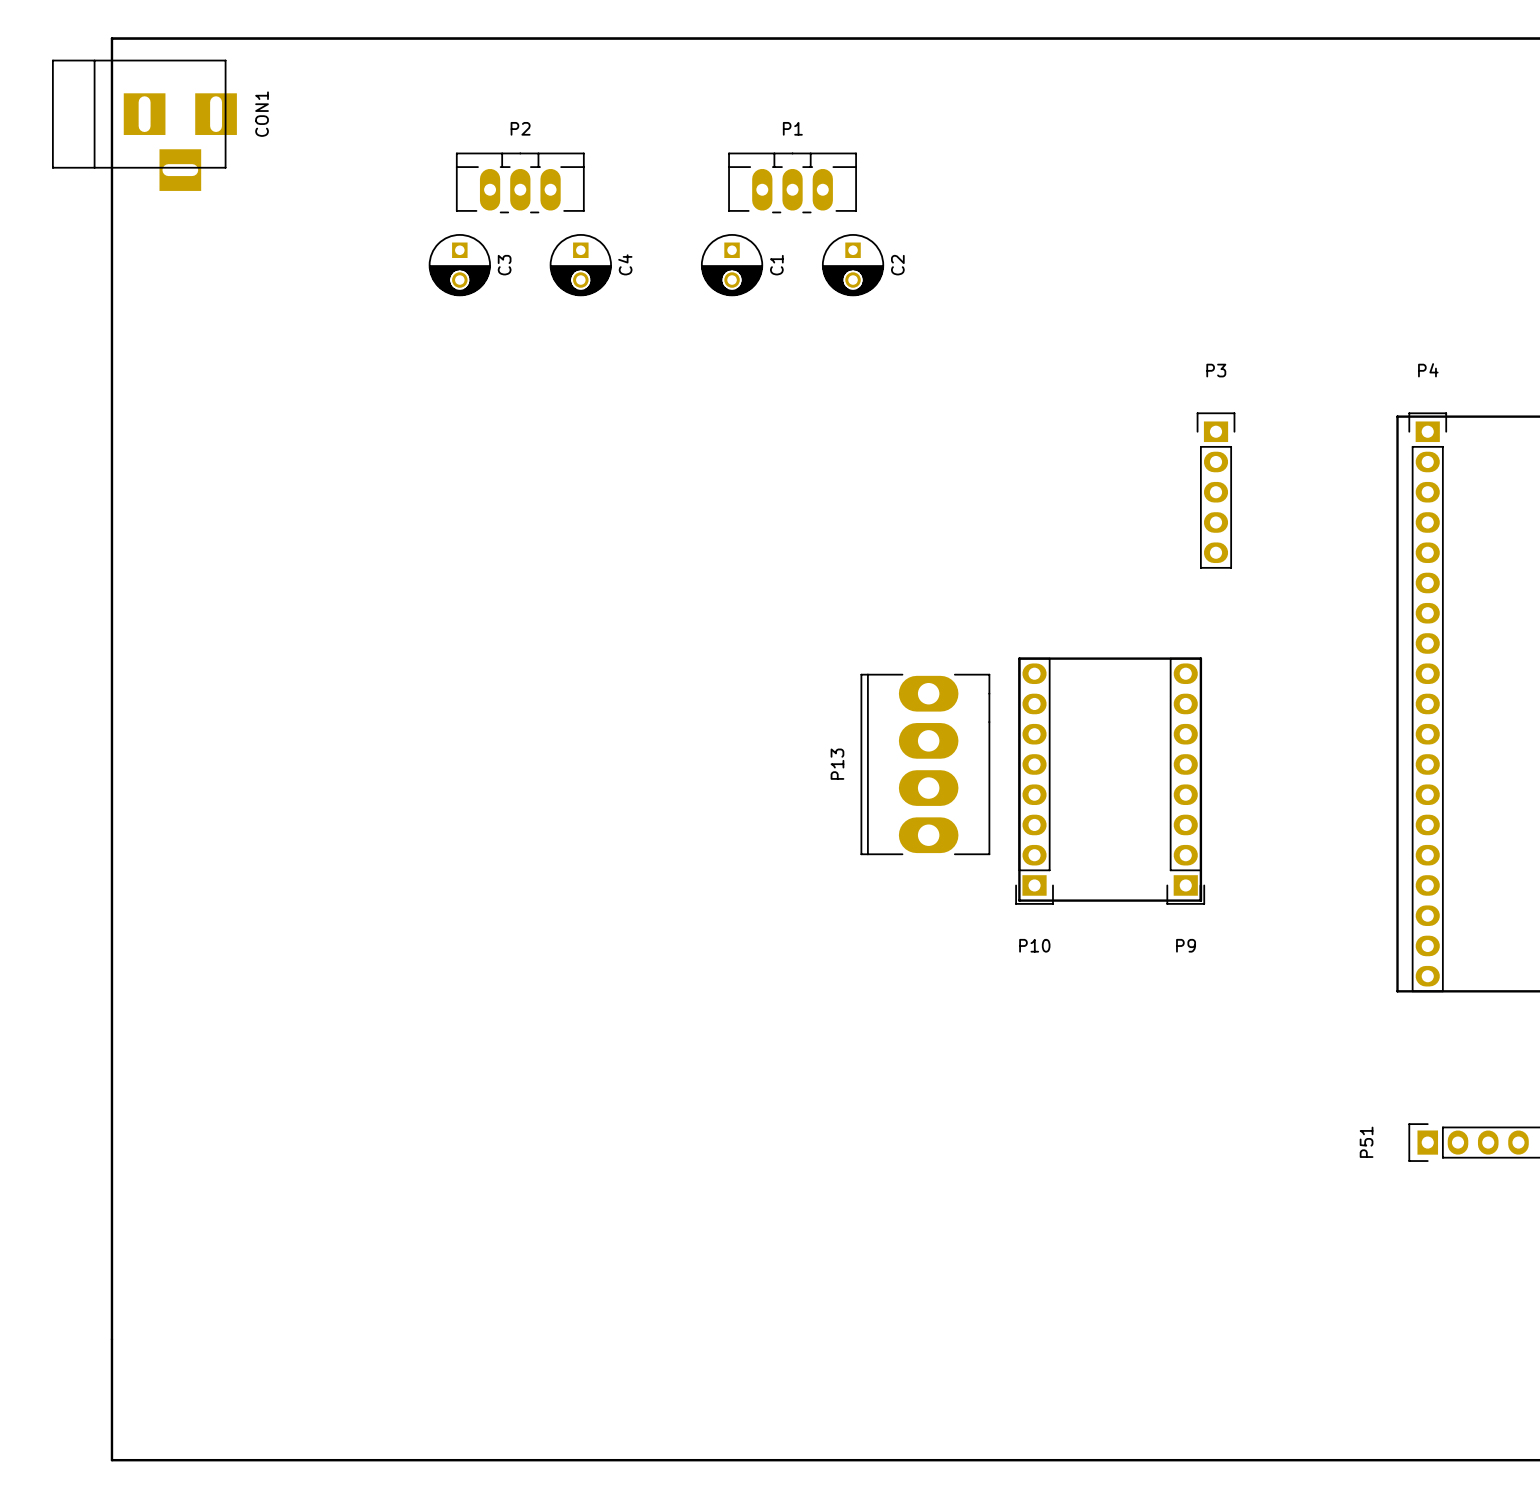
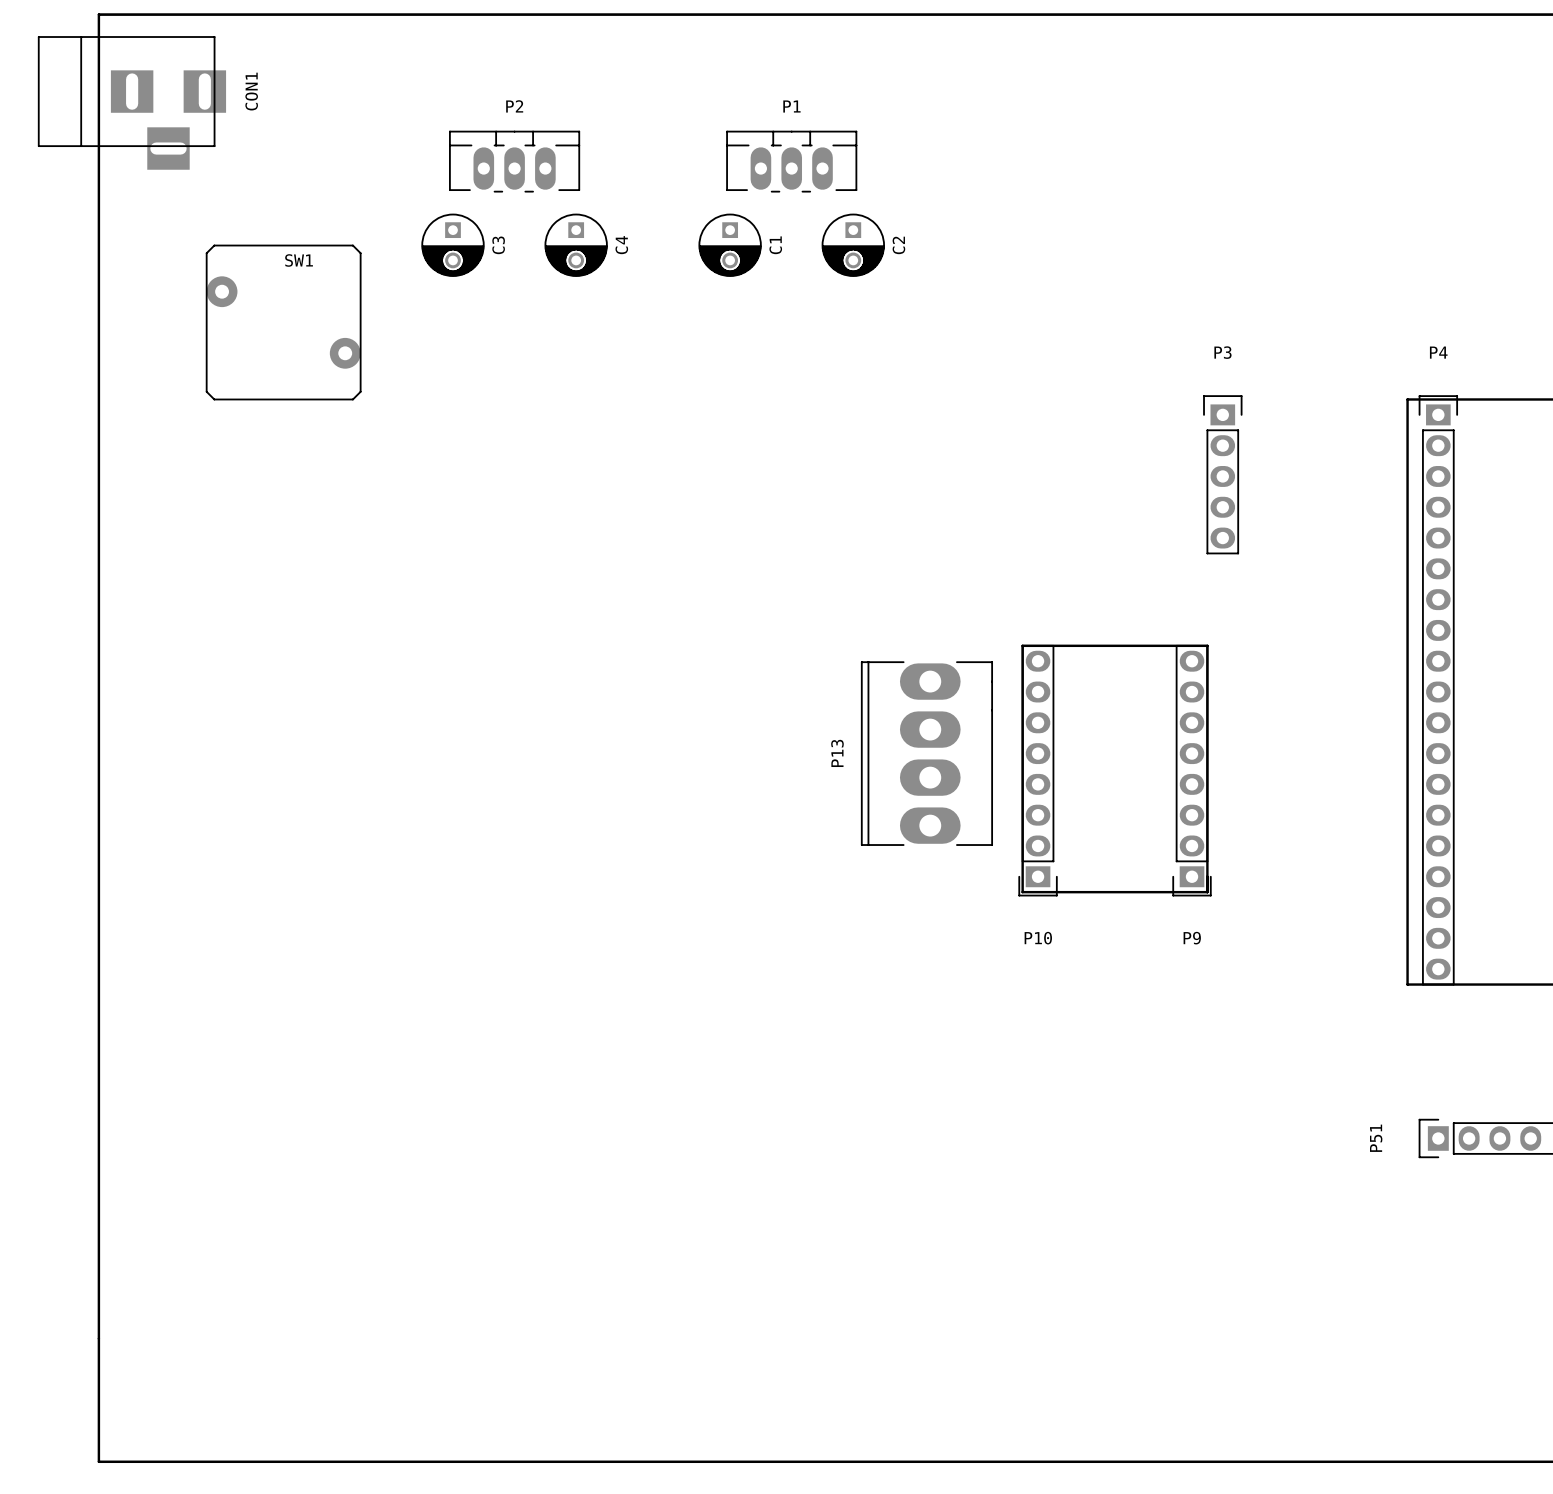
SW1: none -> (283, 322)

